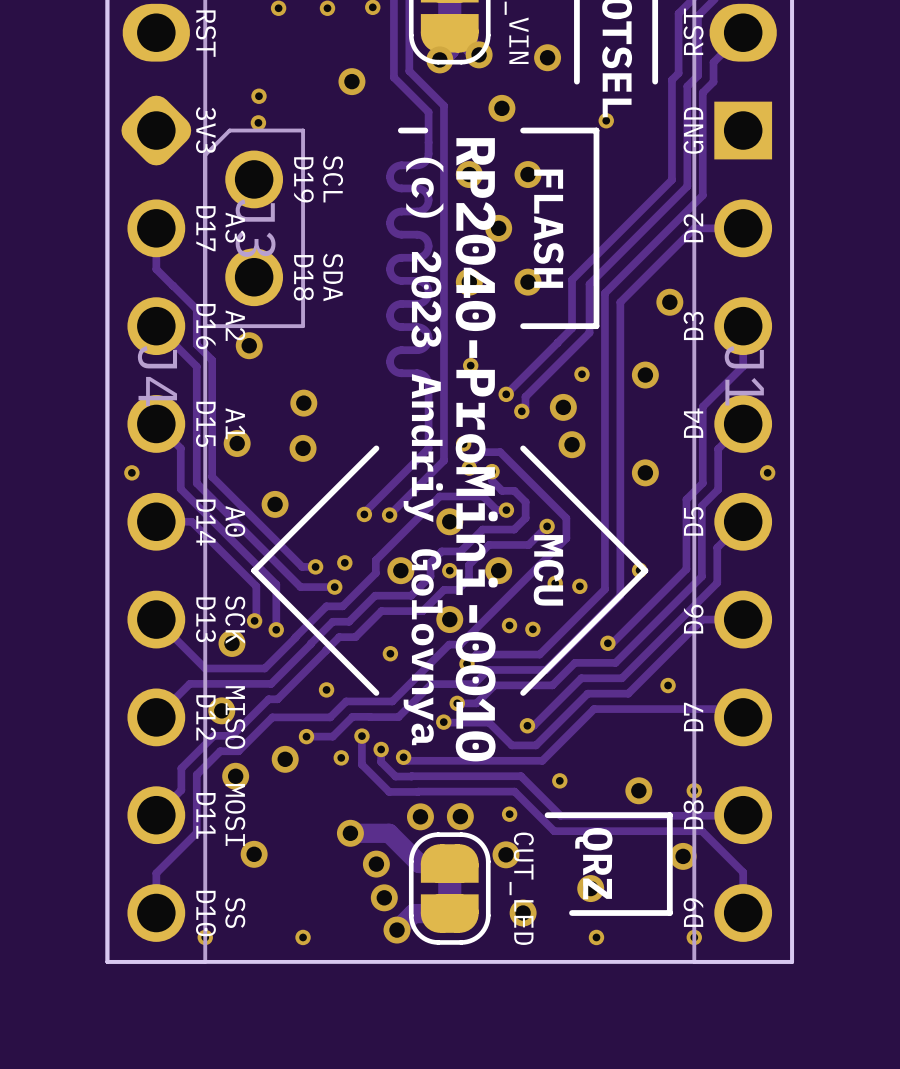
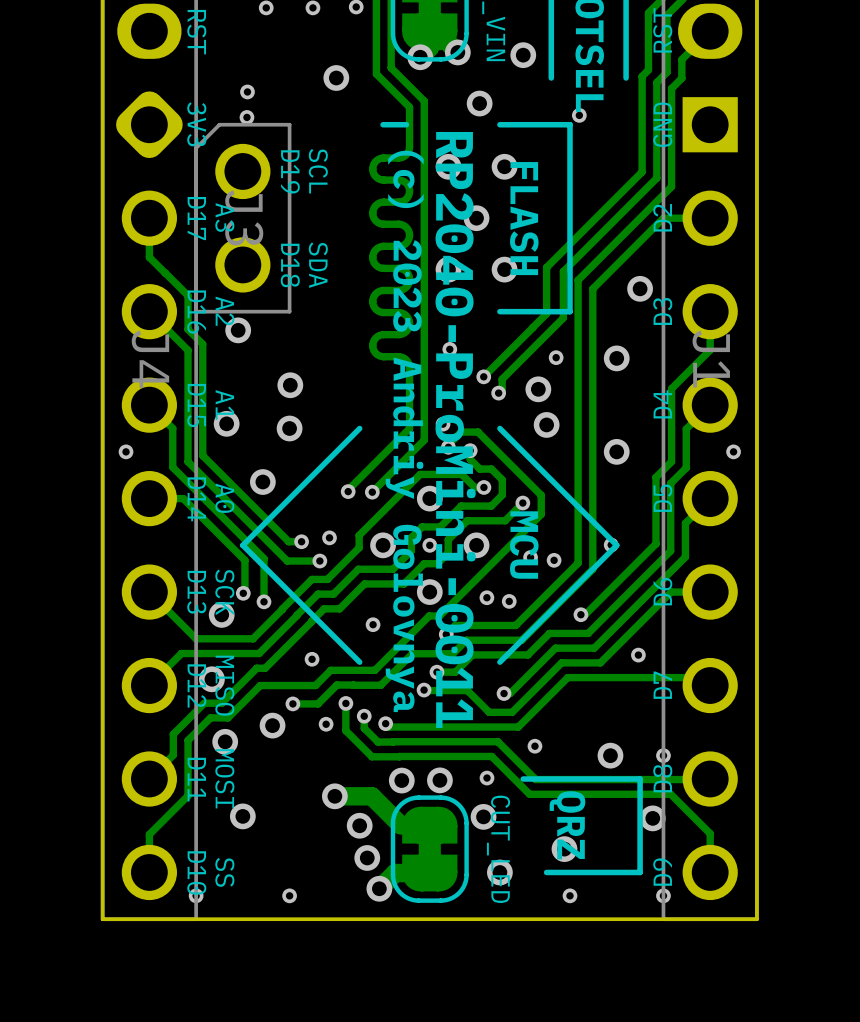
text: RP2040-ProMini-0010 (476, 449) -> RP2040-ProMini-0011 (455, 429)

